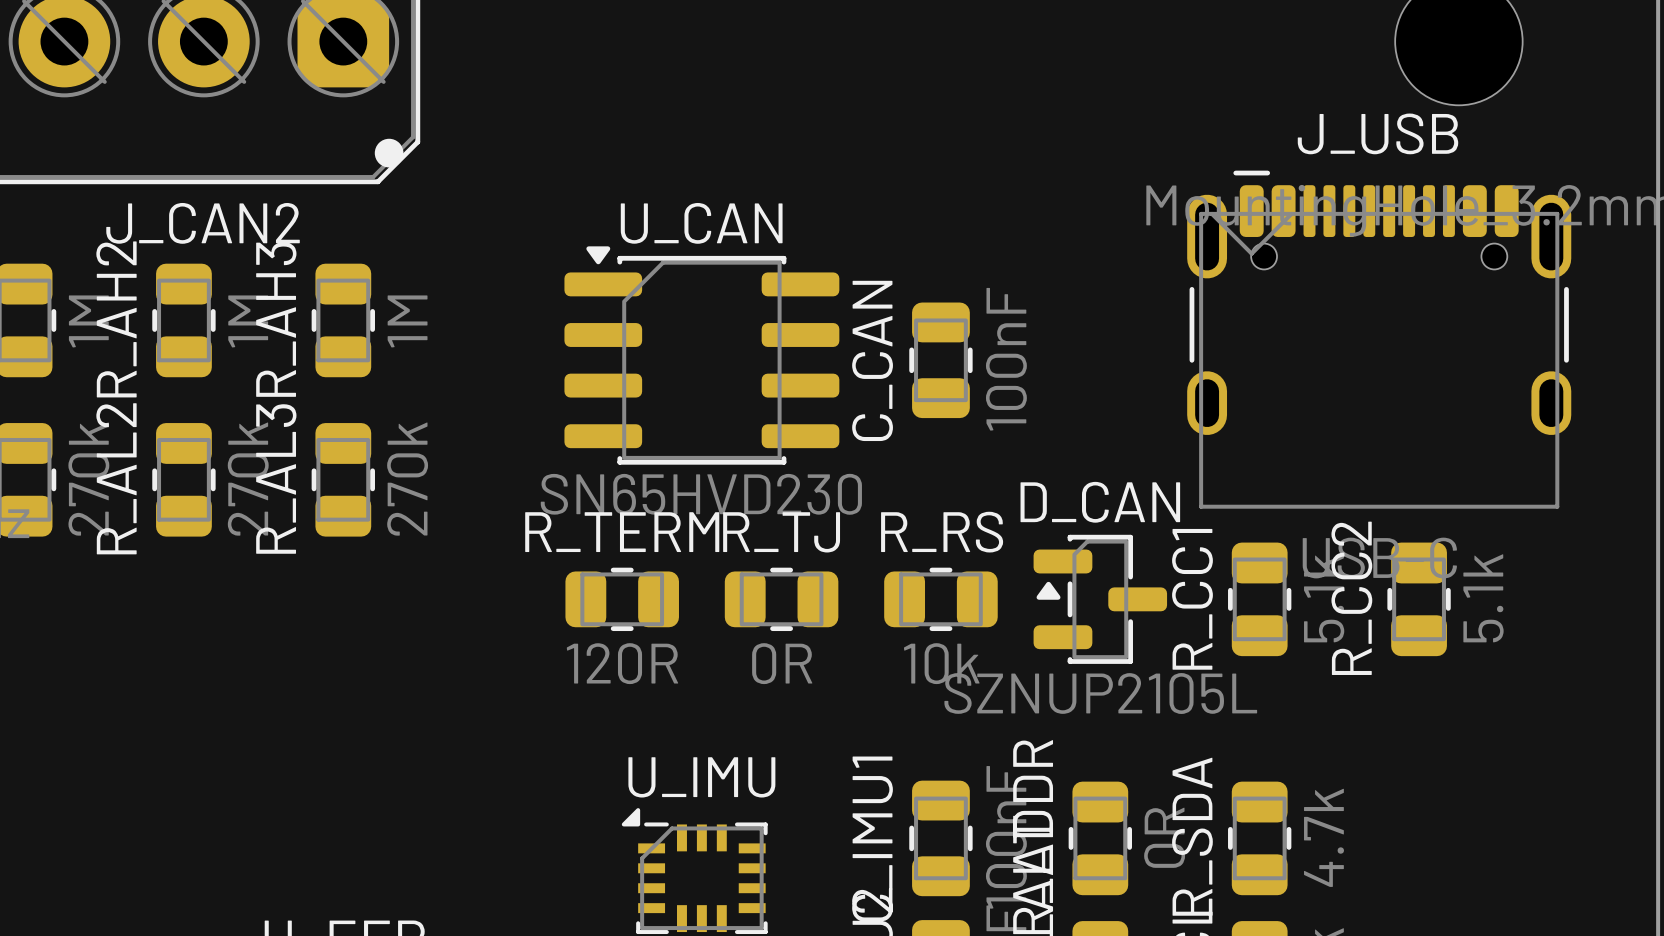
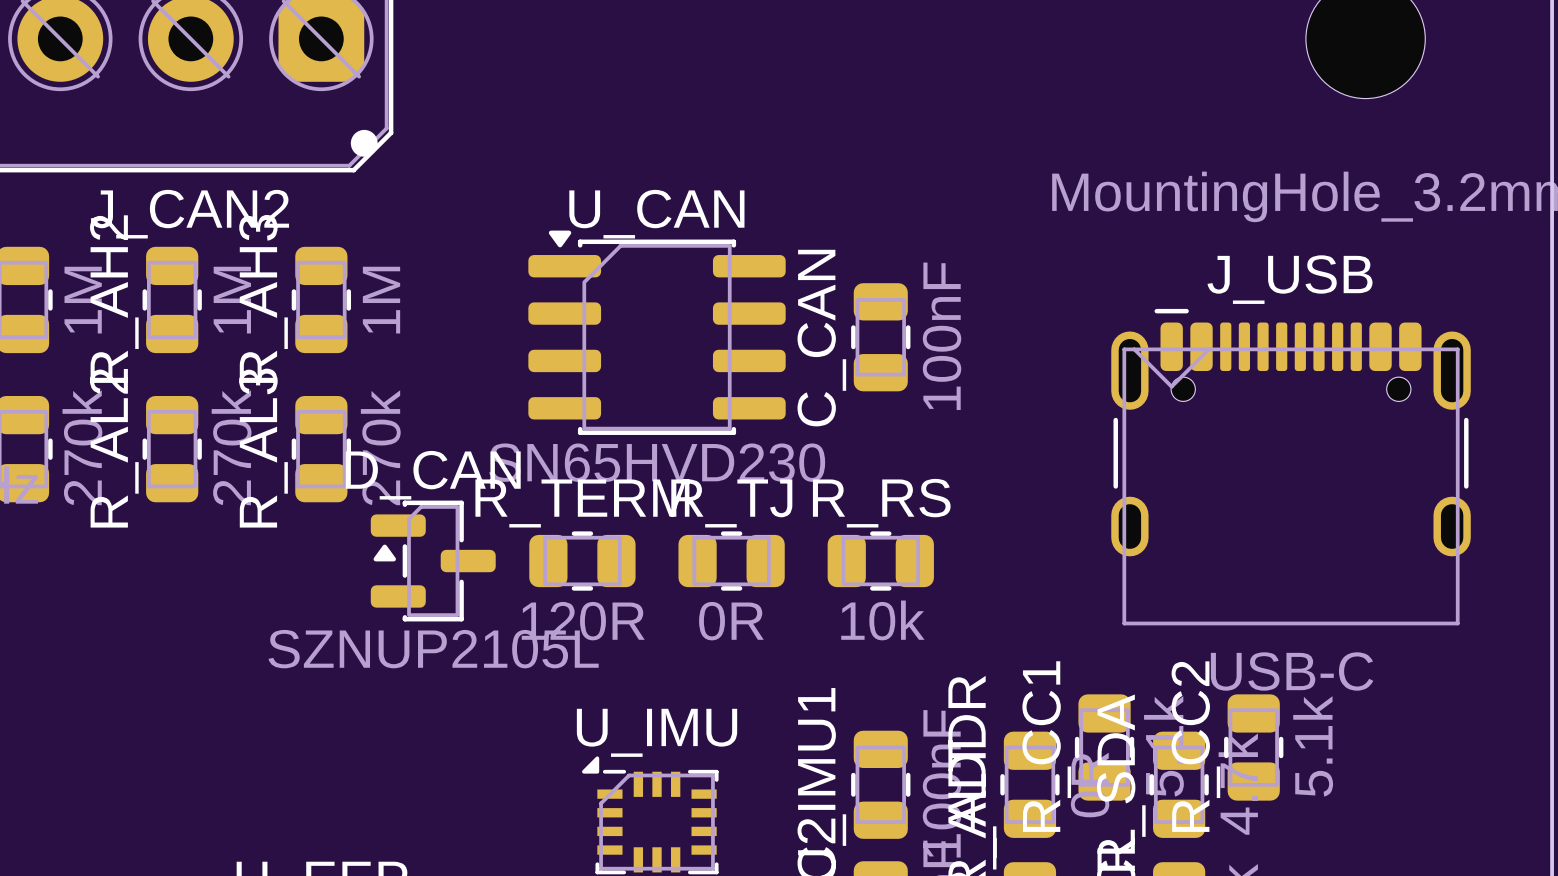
J_USB position: (1379, 339) -> (1291, 467)
D_CAN position: (1100, 599) -> (433, 561)
R_CC1 position: (1259, 599) -> (1104, 747)
R_CC2 position: (1419, 599) -> (1253, 747)

